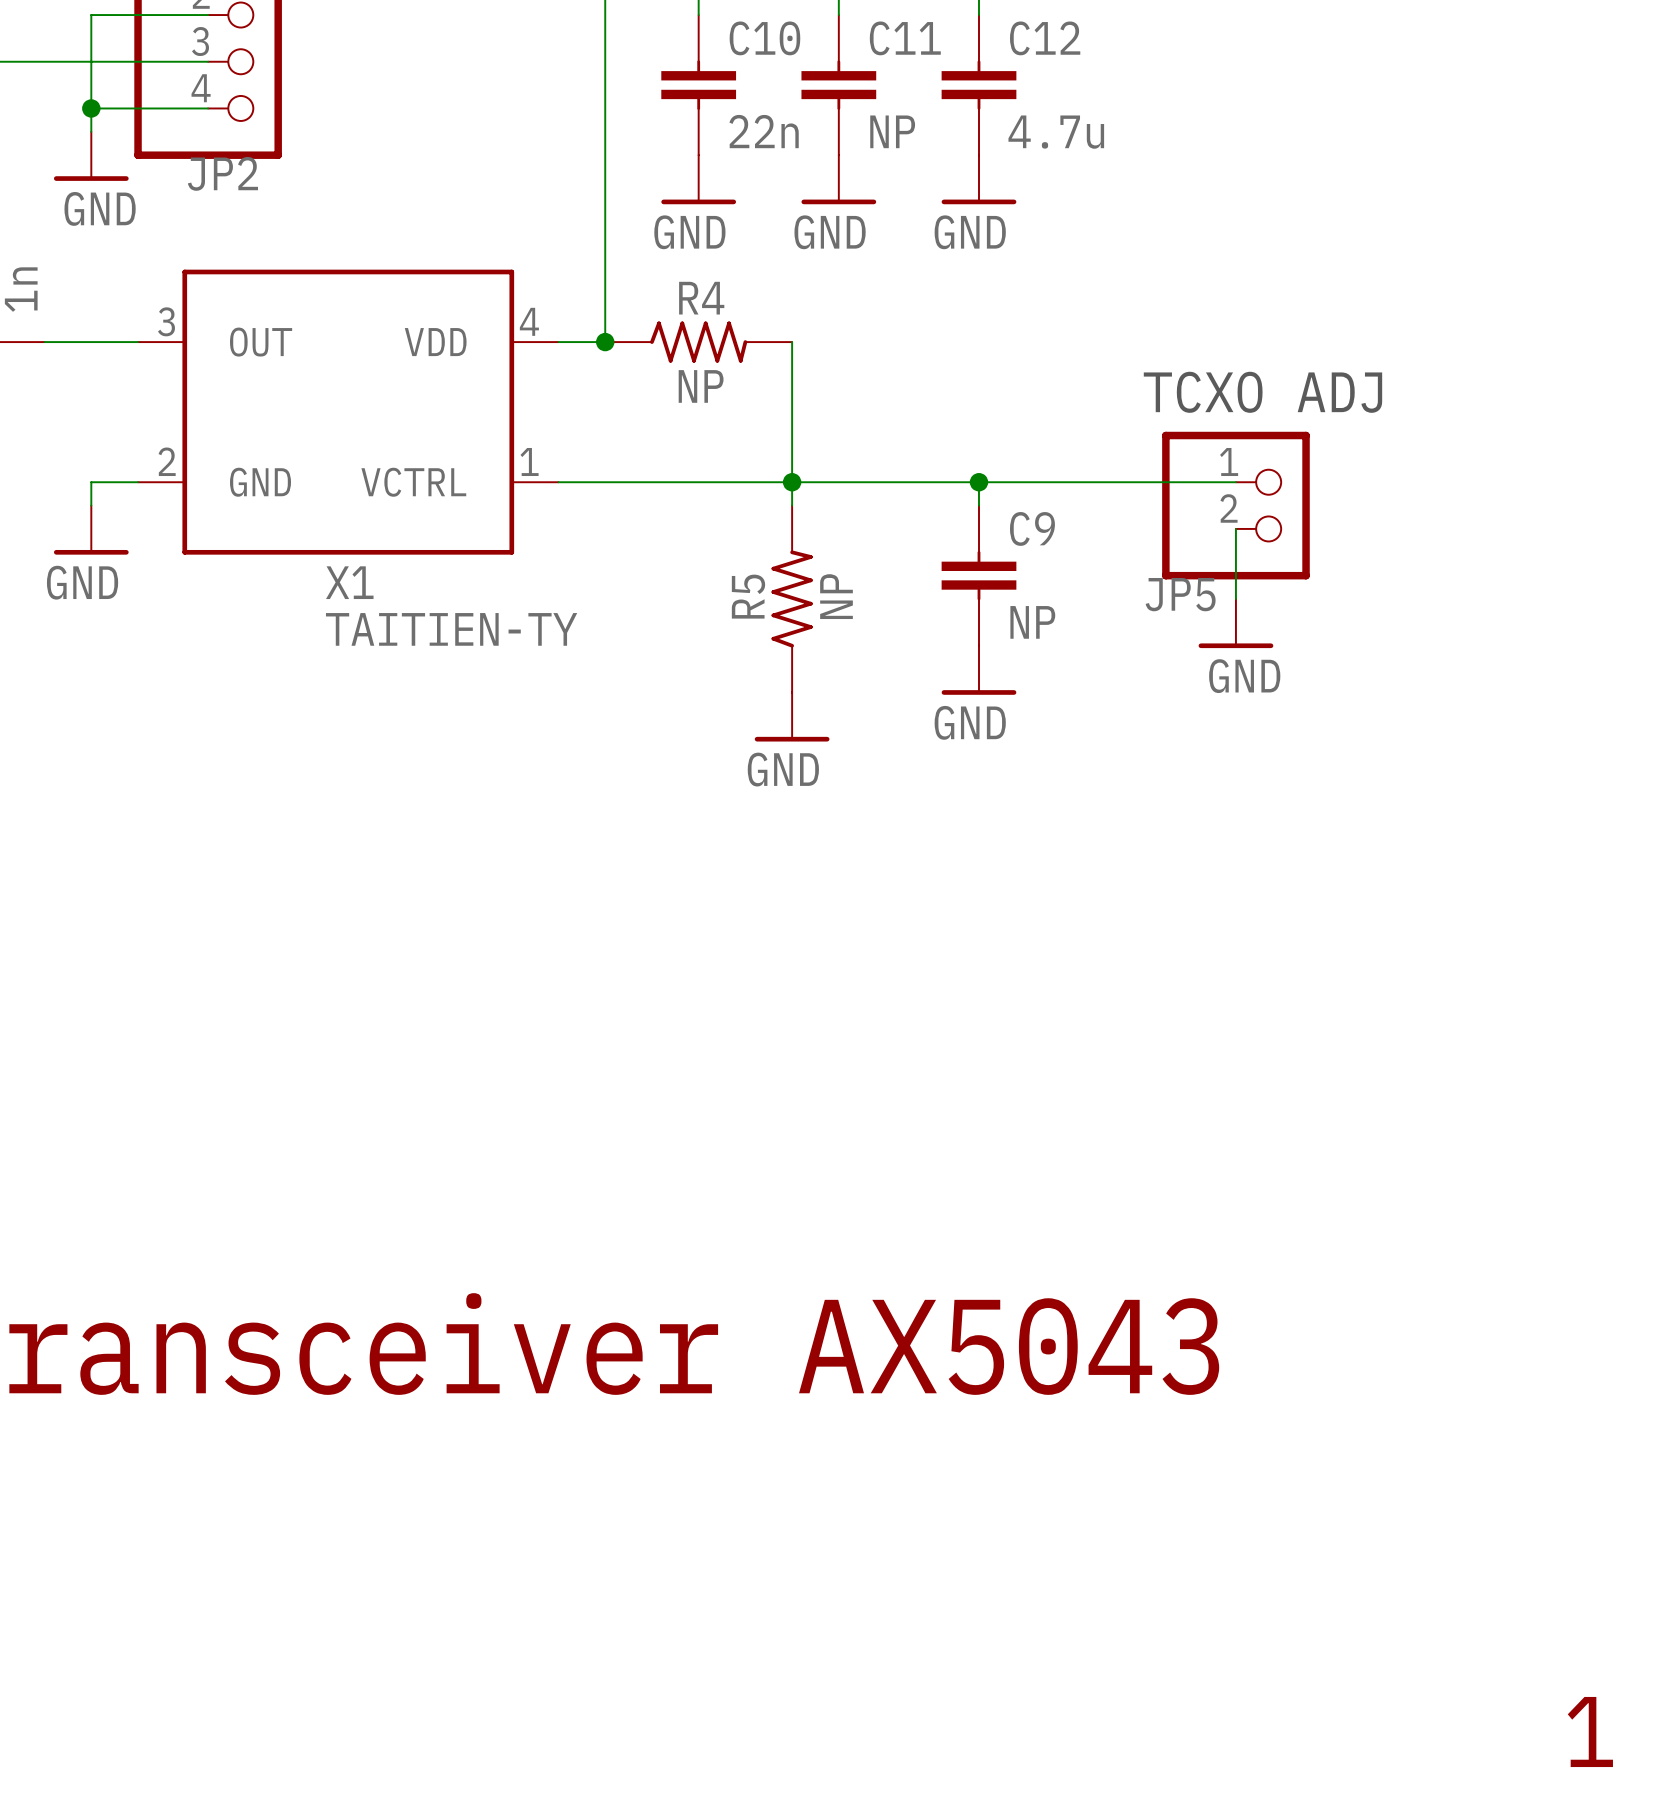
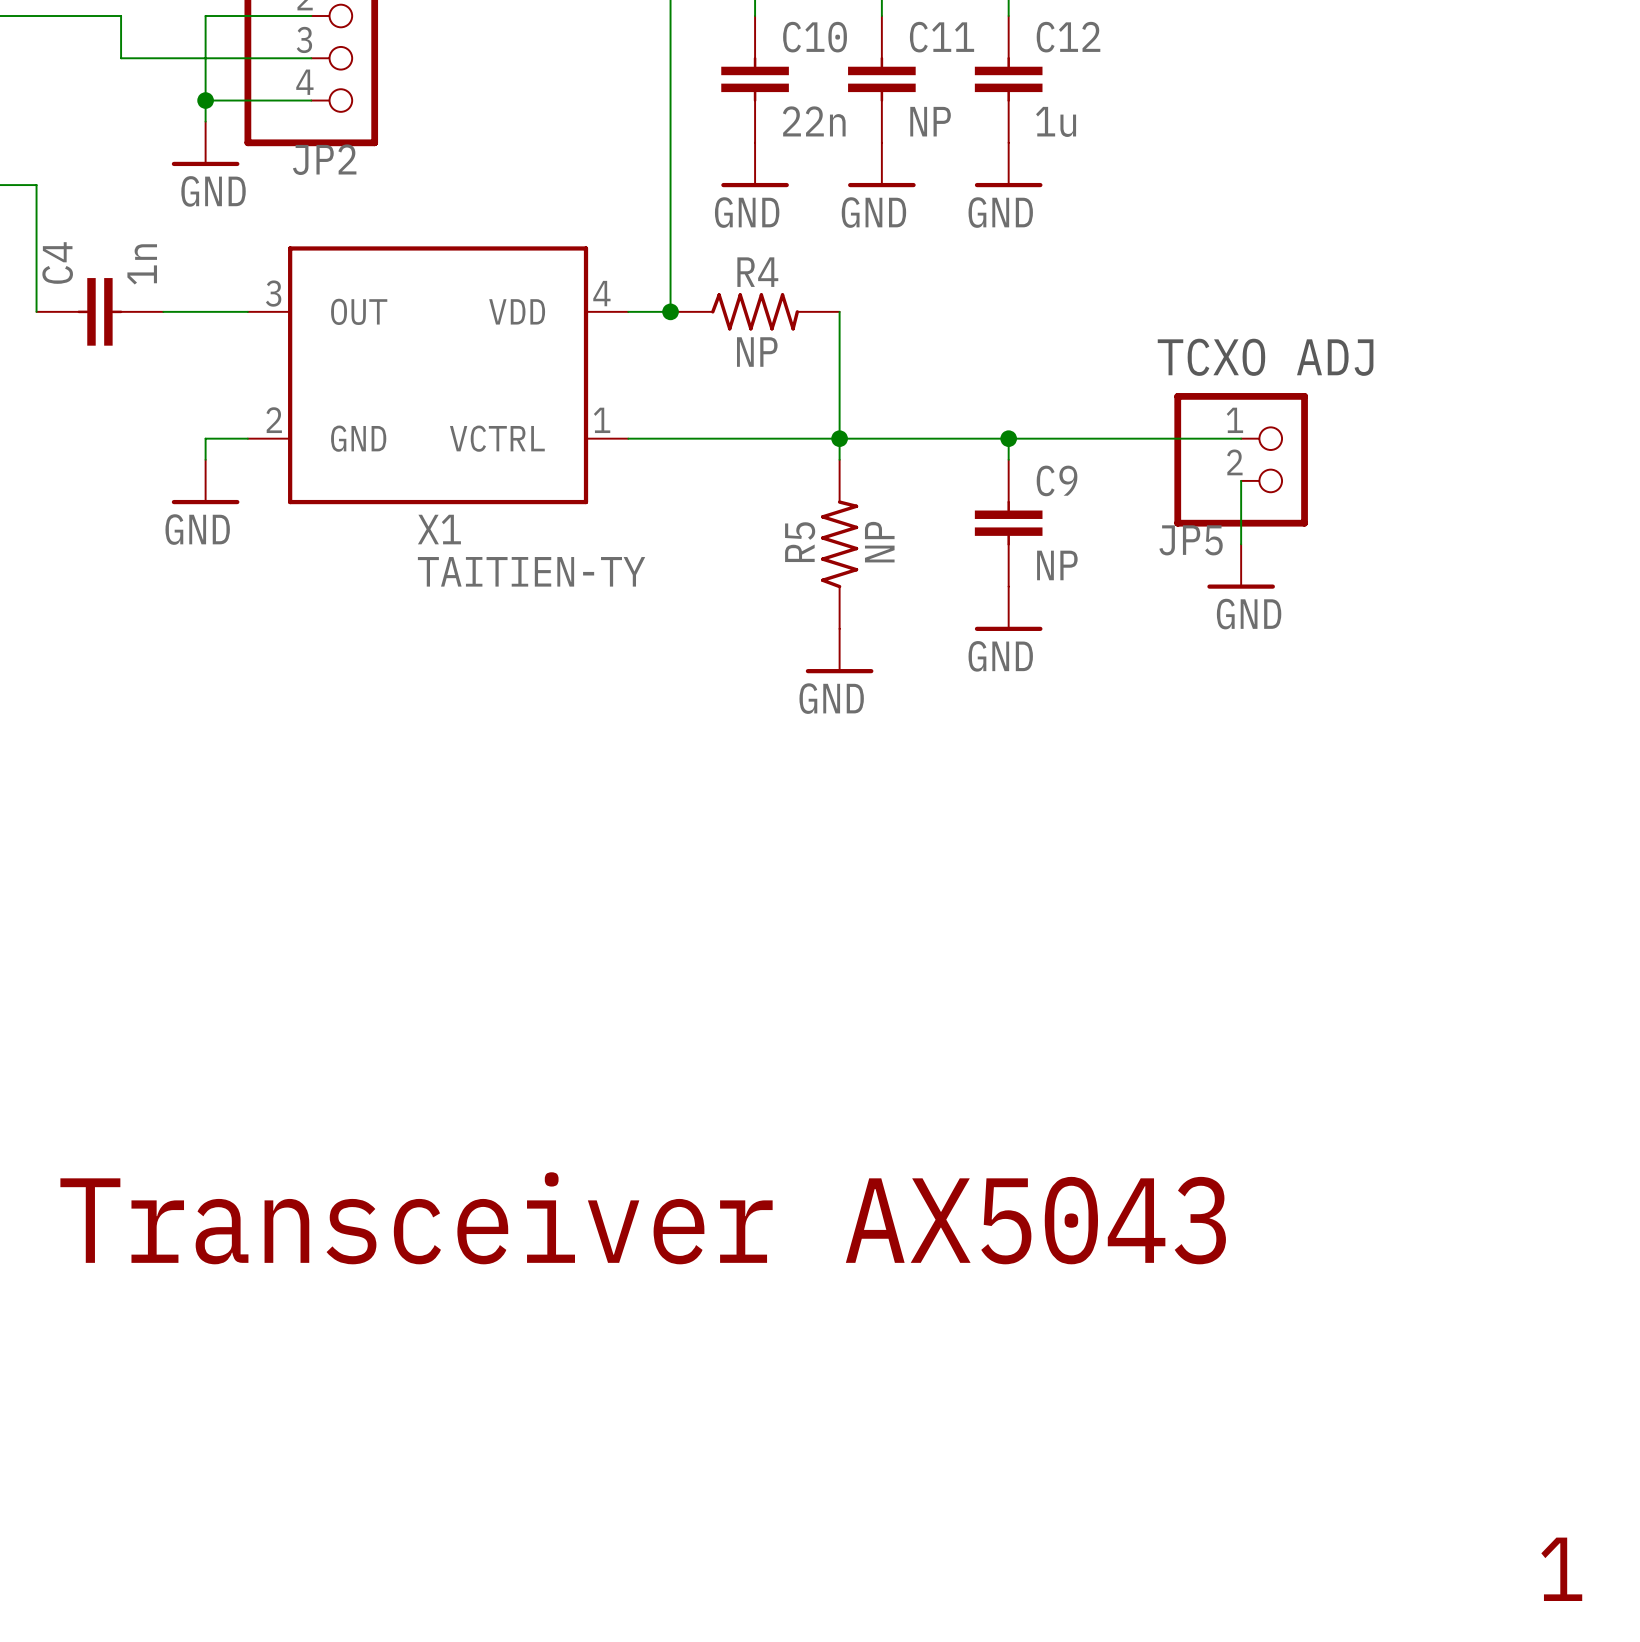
C12 value: 4.7u (1056, 132) -> 1u (1056, 121)

